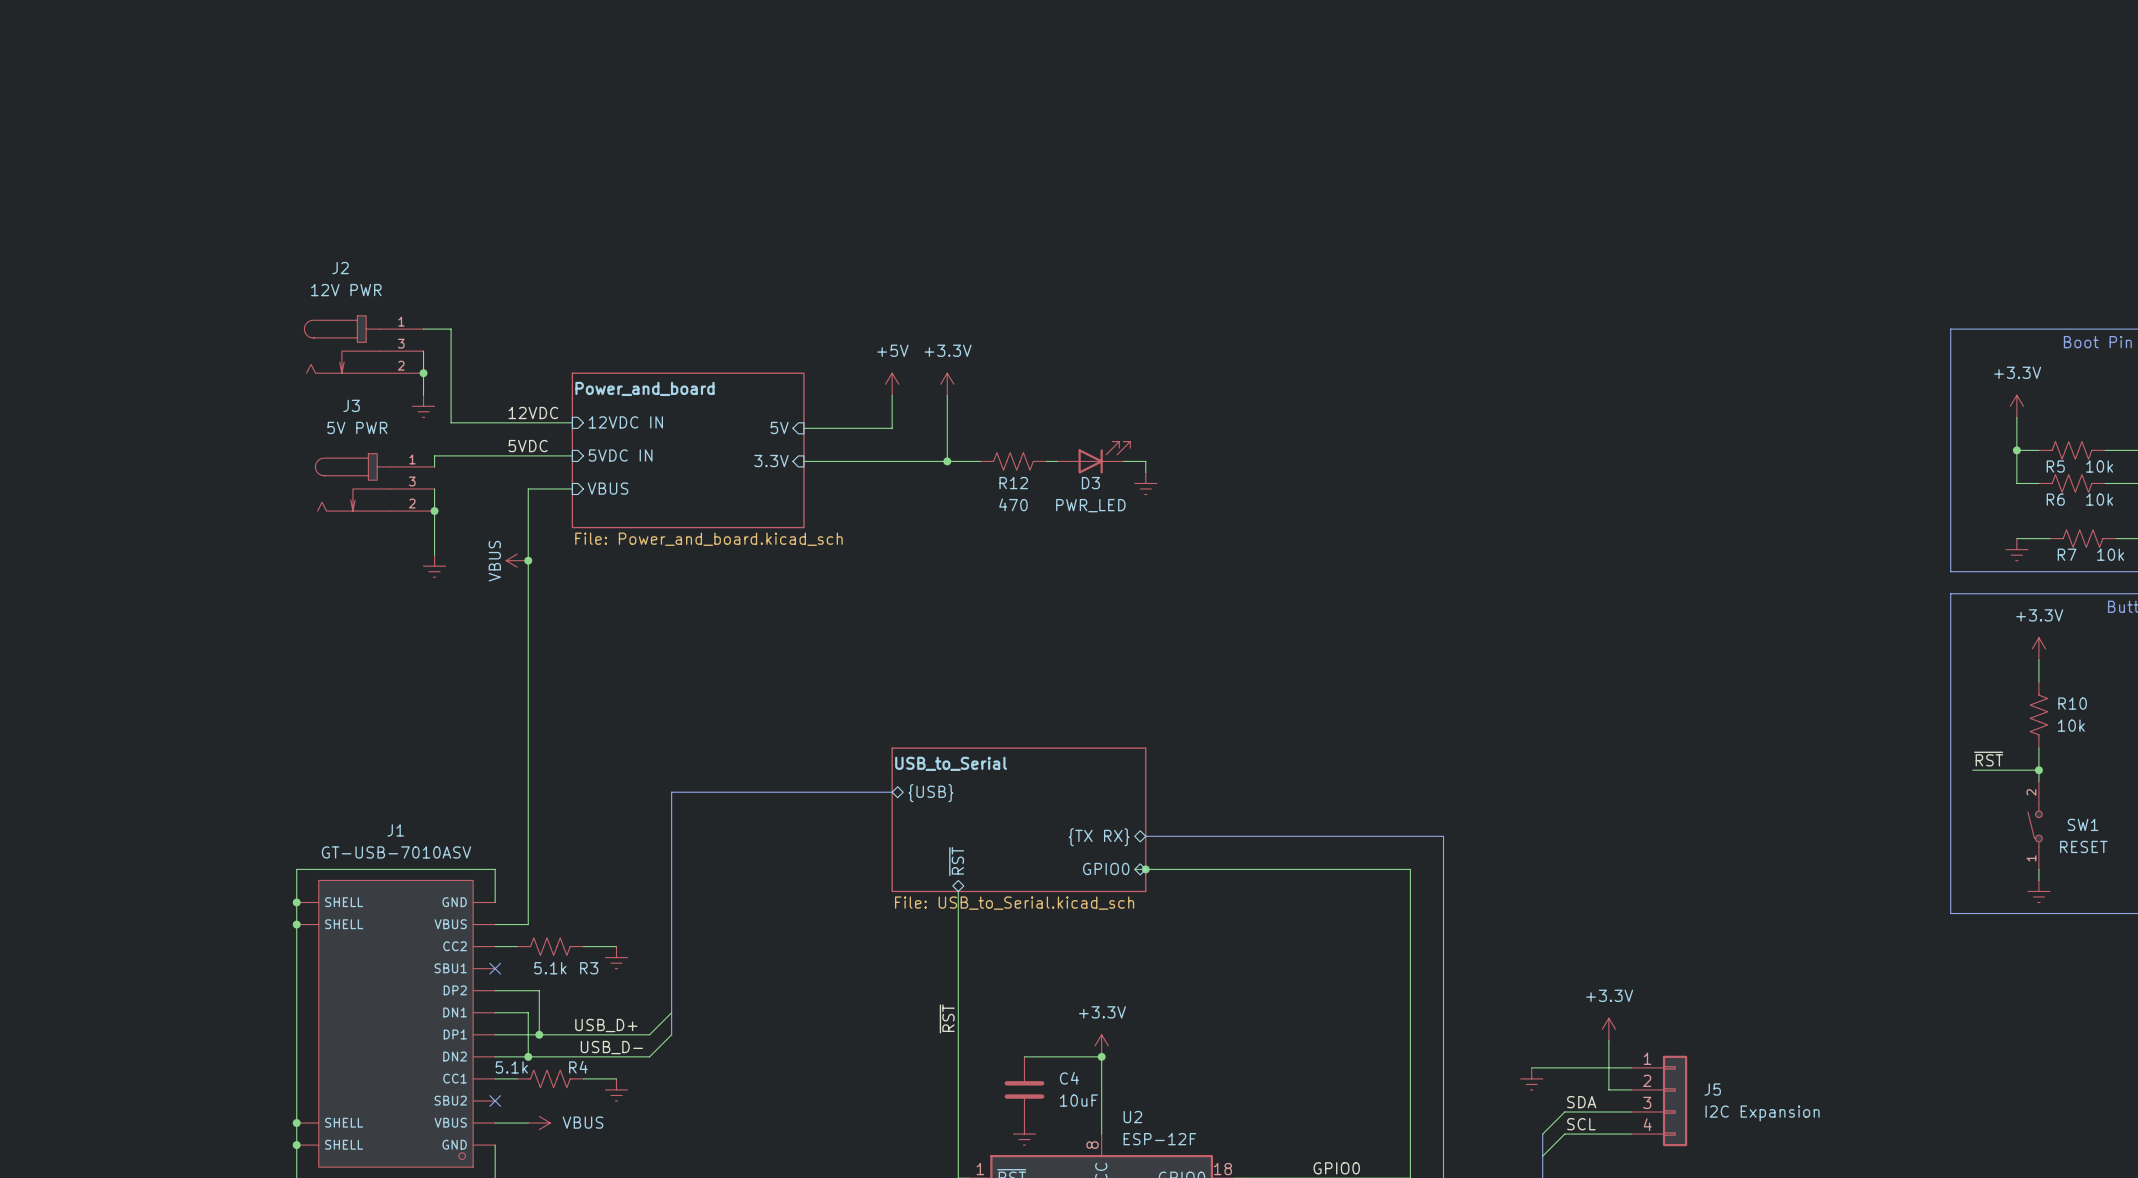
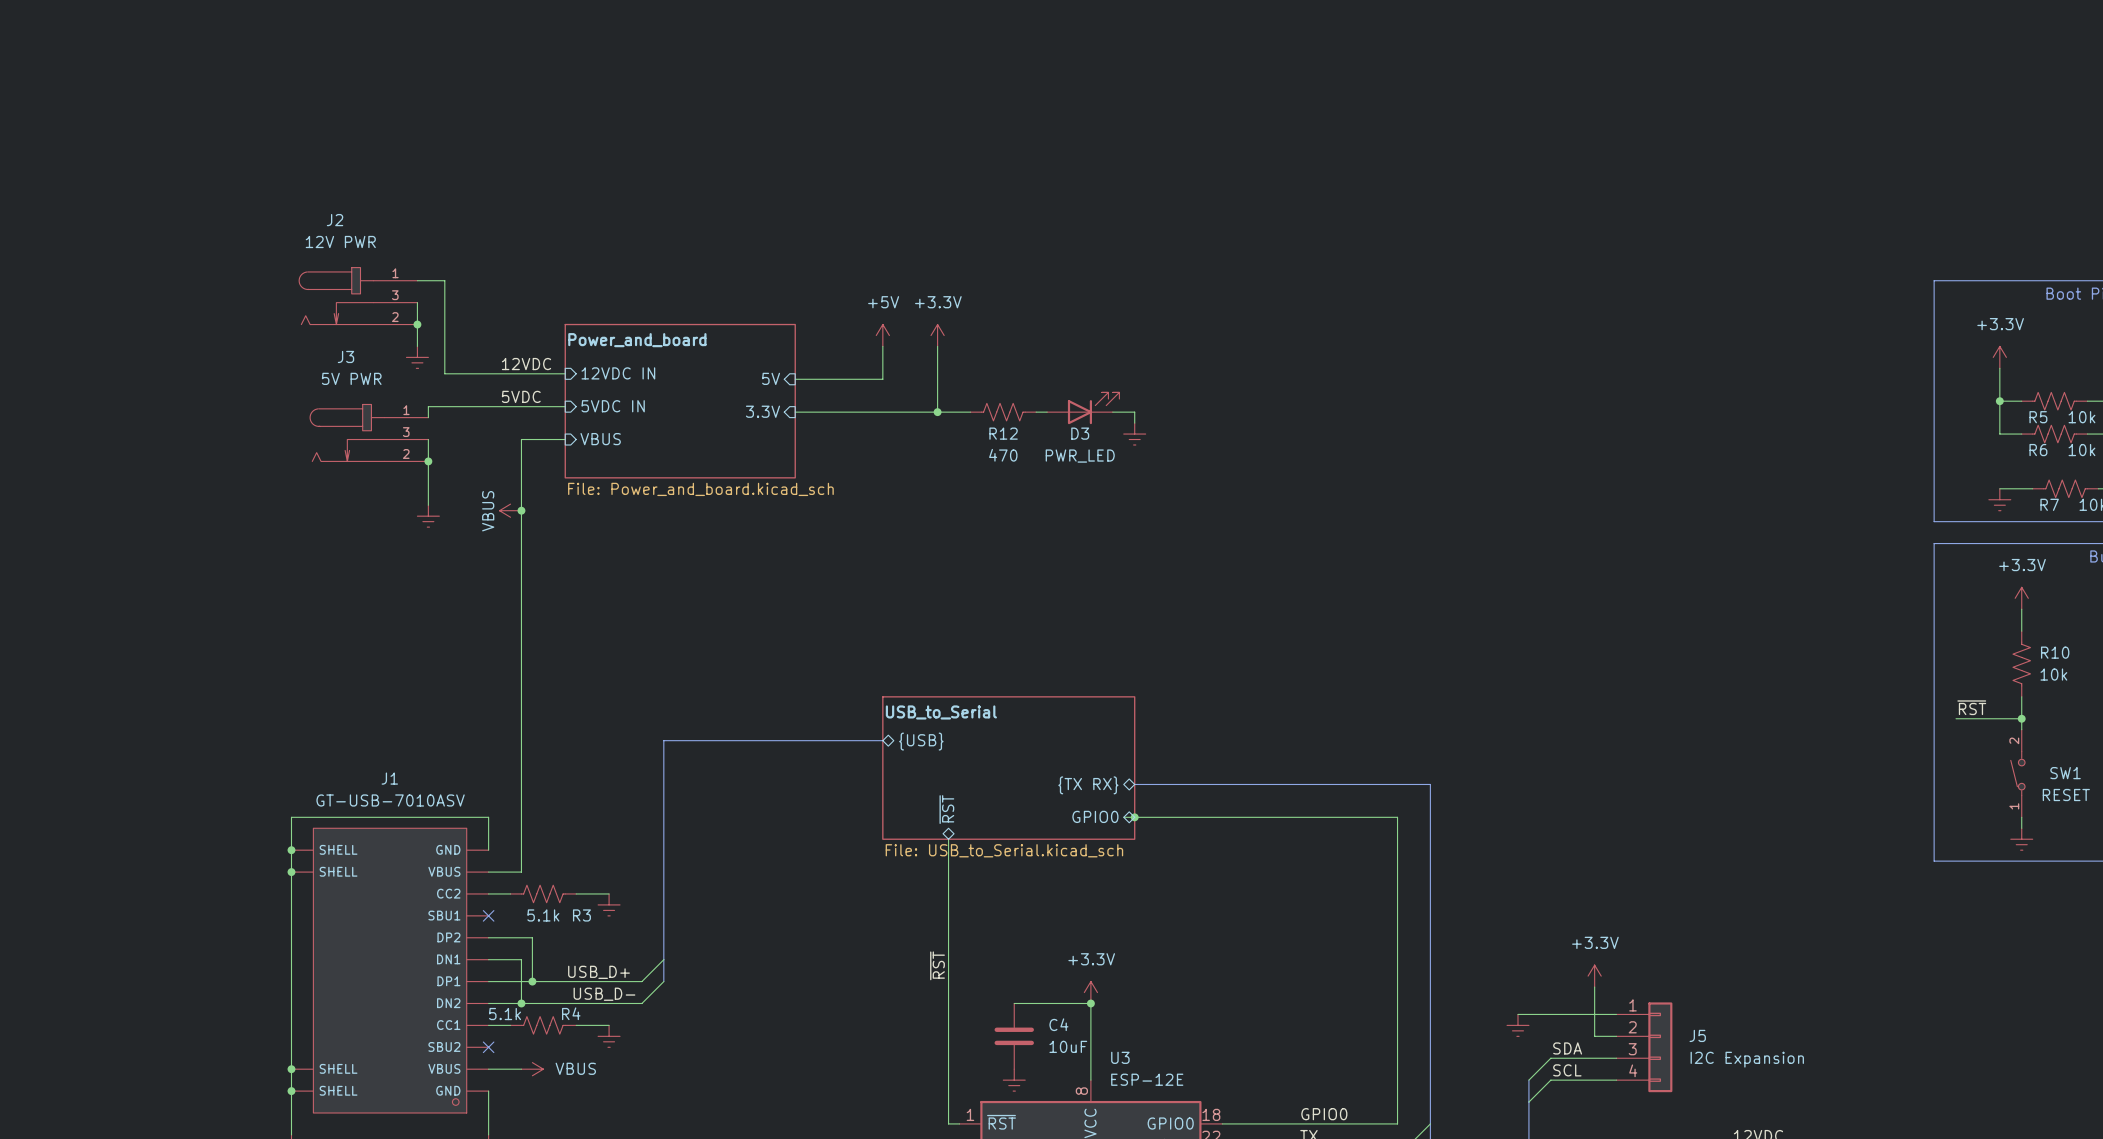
U2 name: U2 (1132, 1117) -> U3 (1120, 1057)
U2 value: ESP-12F (1159, 1139) -> ESP-12E (1147, 1079)

